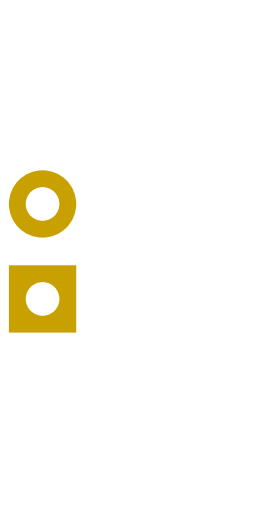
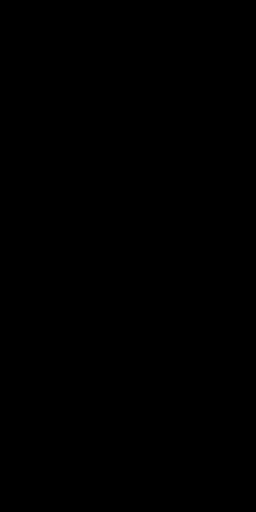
part: (42, 251) -> none

